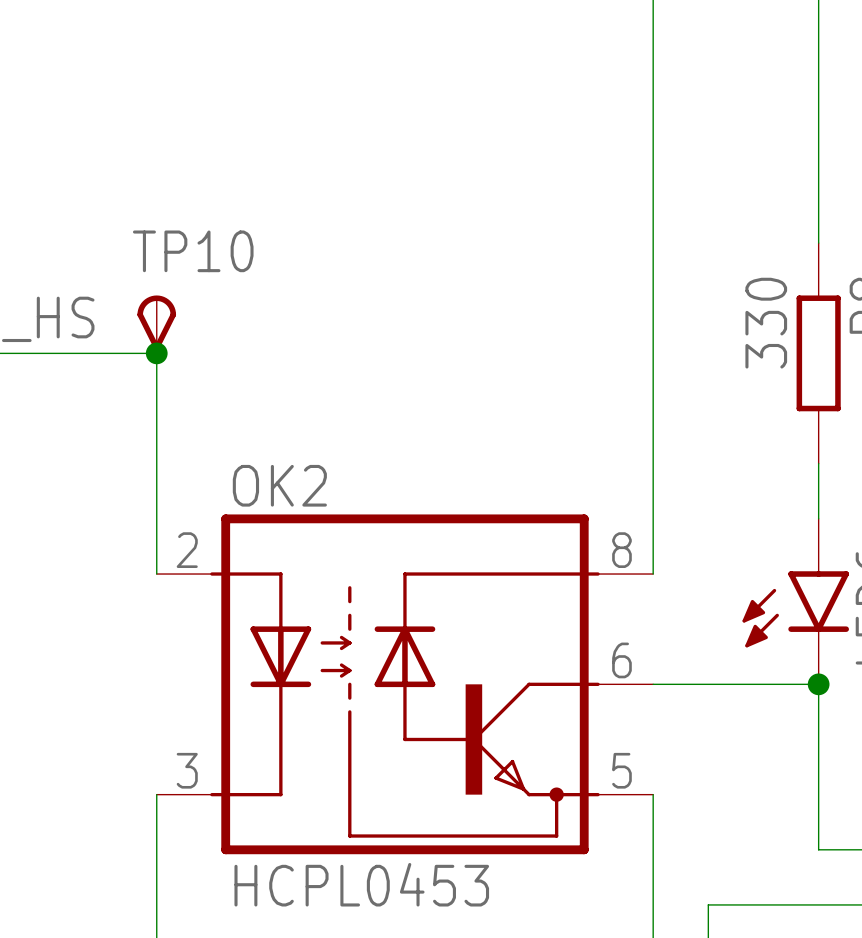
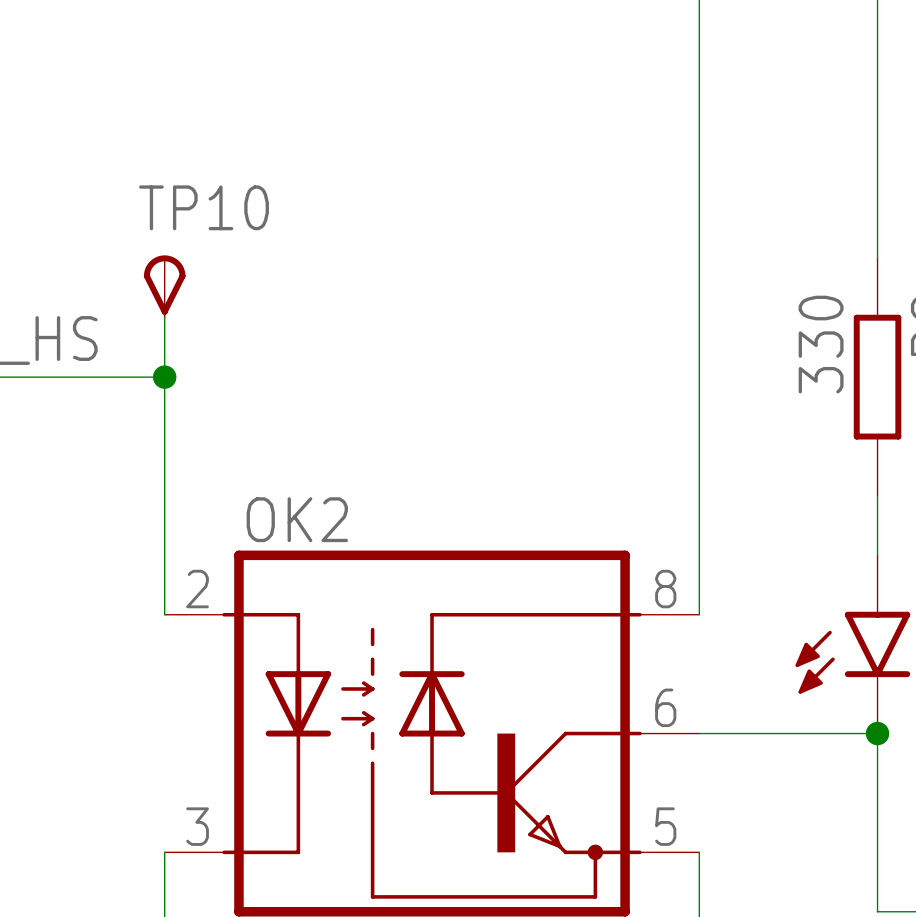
TP10 position: (156, 324) -> (164, 286)

